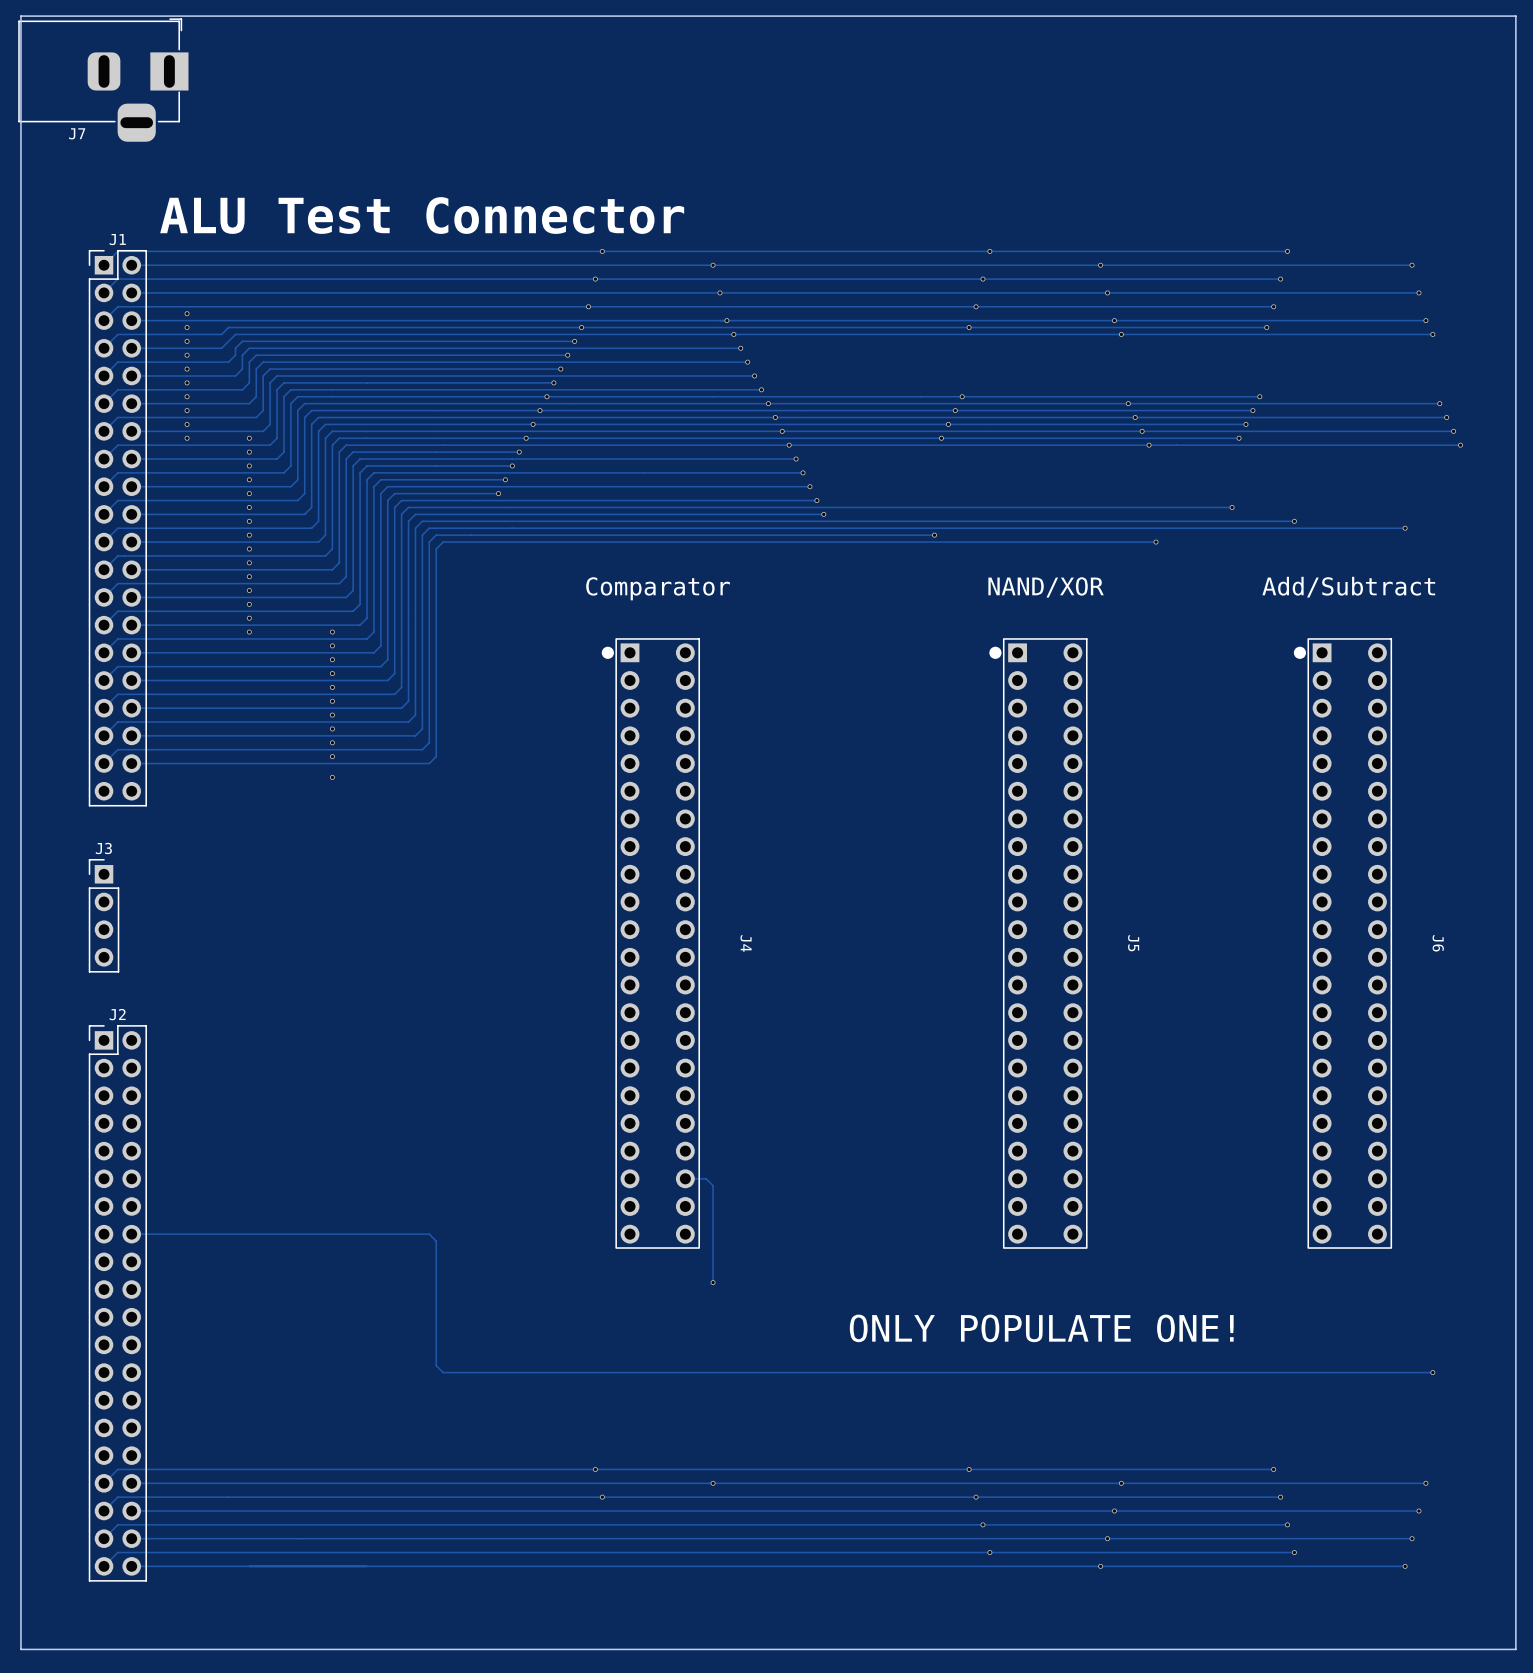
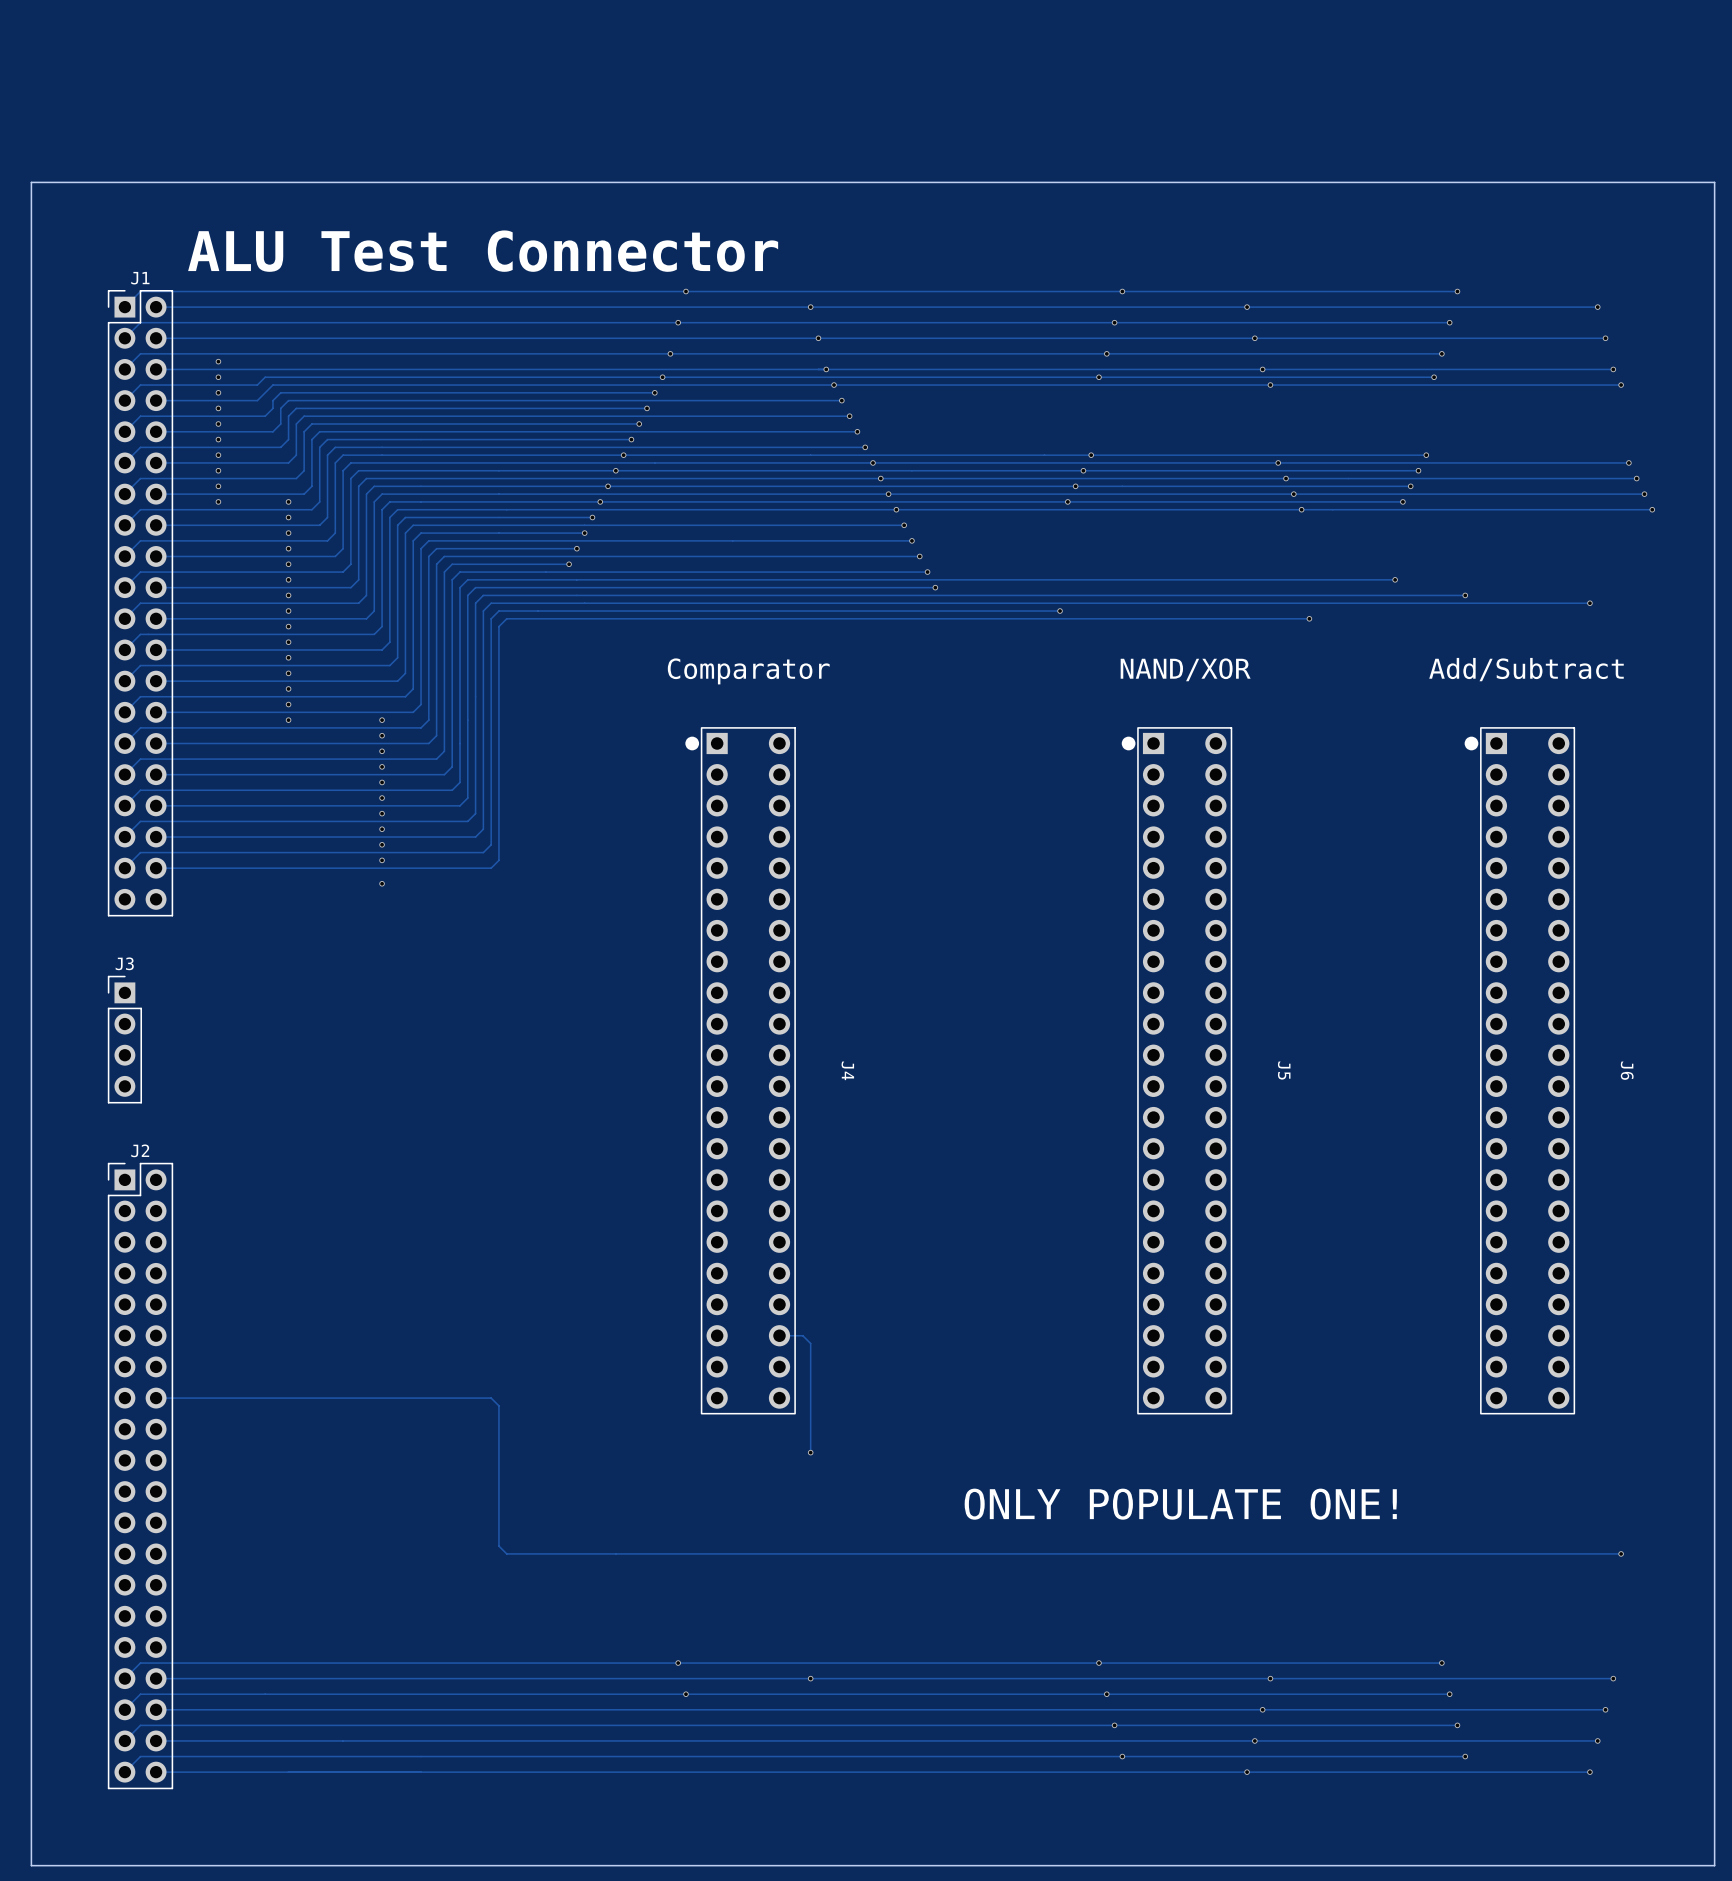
J7: (103, 80) -> none
board edge: (20, 154) (20, 16) (1515, 16) (1515, 154) -> (31, 182) (1714, 182)

